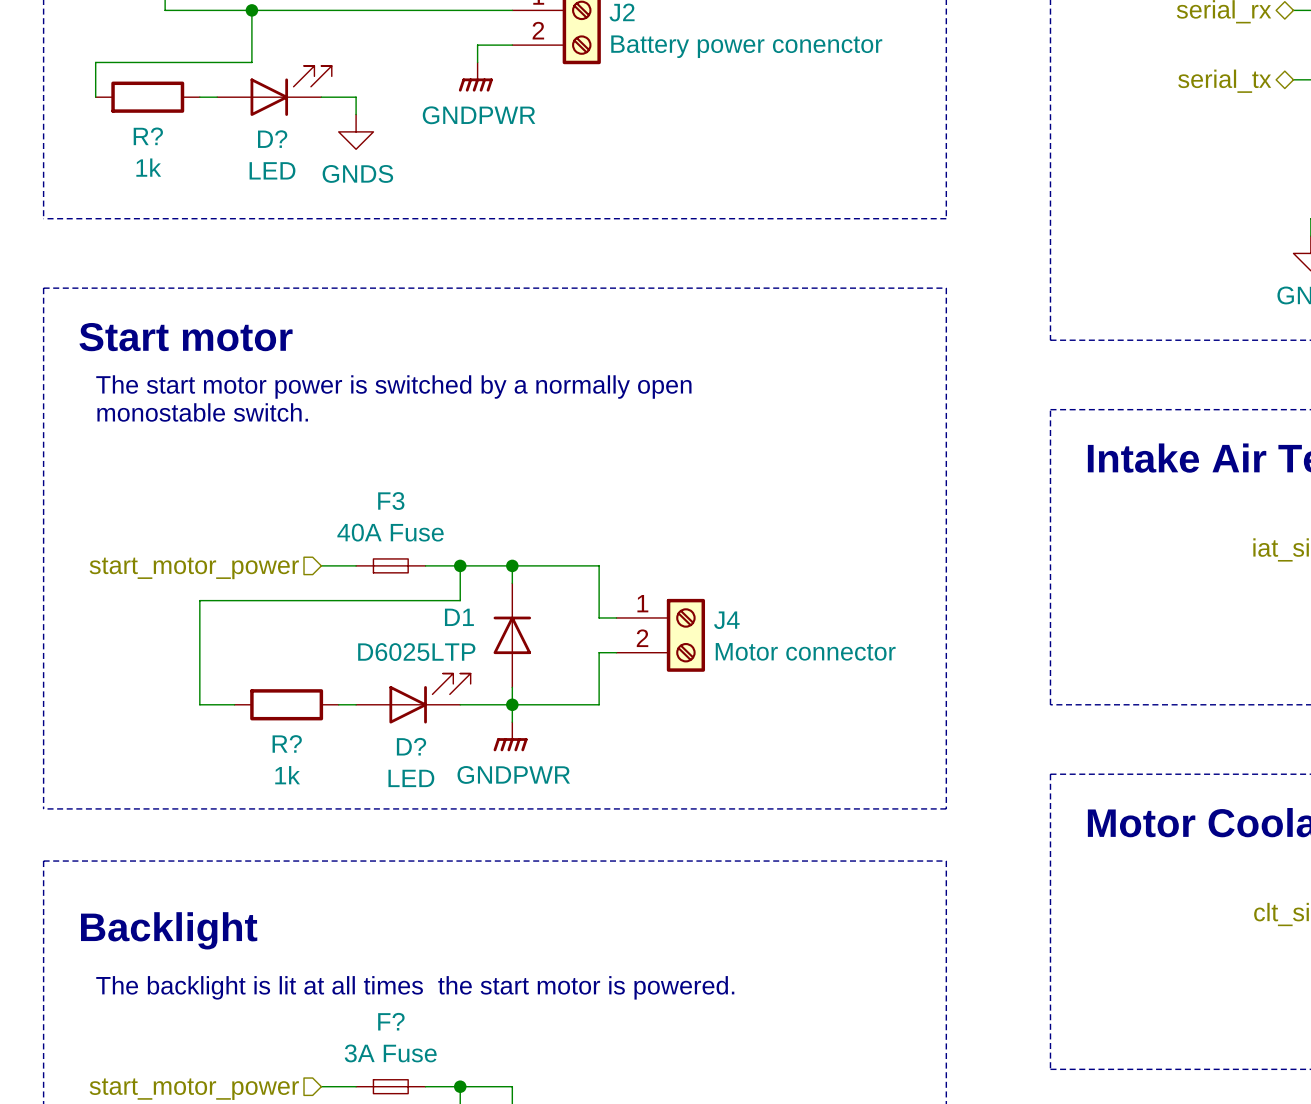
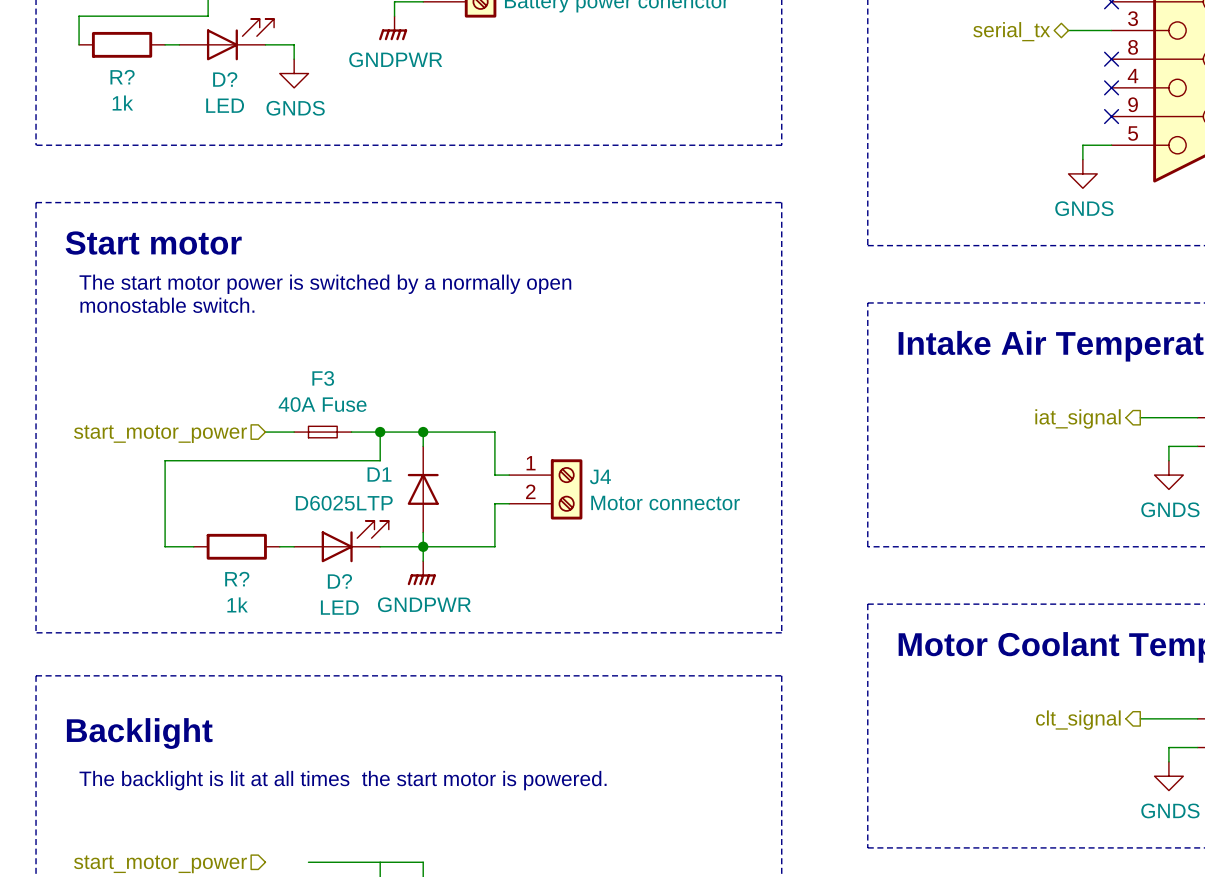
wire: (321, 1086) (356, 1086) -> none
F?: 3A Fuse (390, 1086) -> none
junction: (460, 1086) -> none

